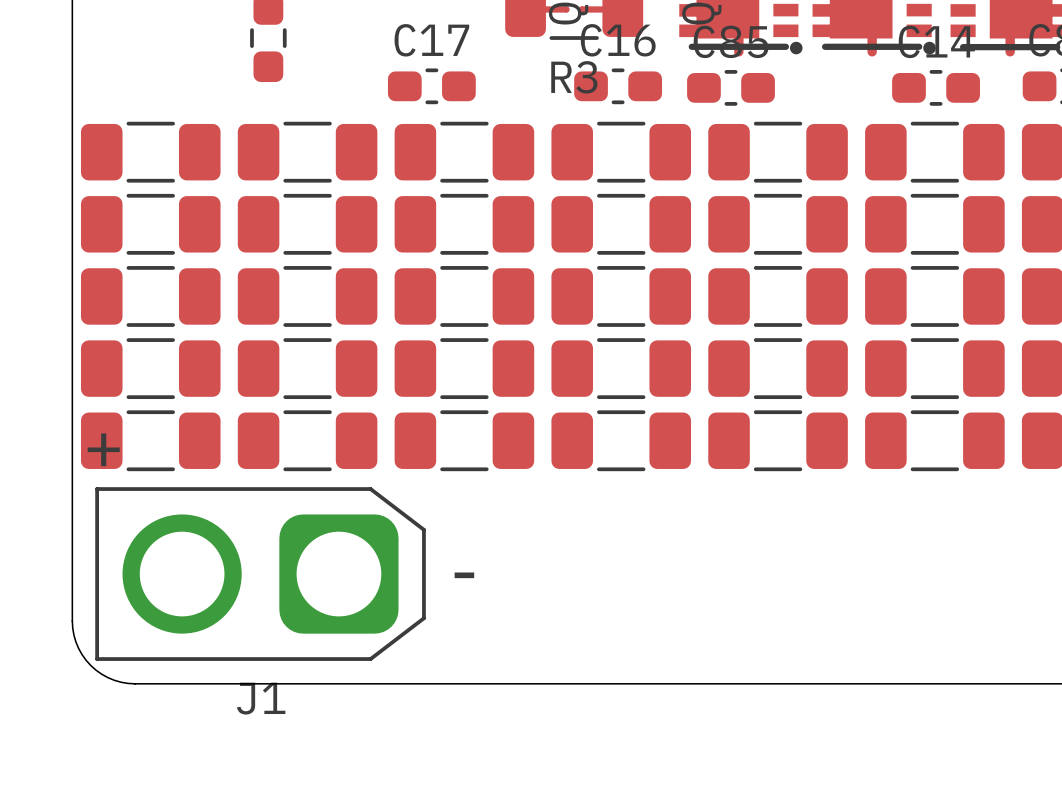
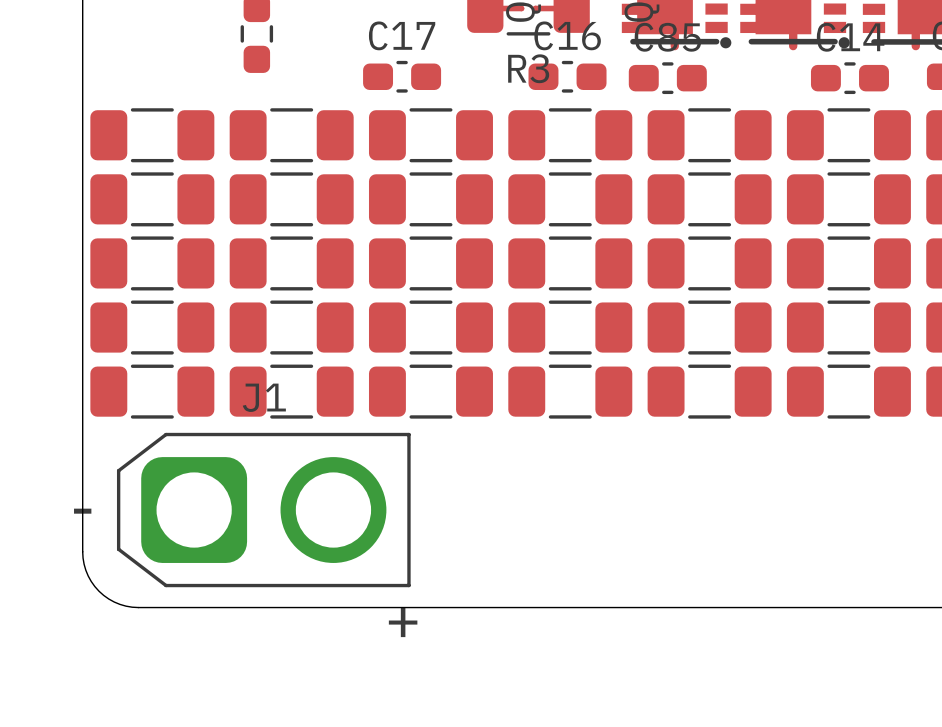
J1 rotation: 0° (260, 574) -> 180° (263, 510)

